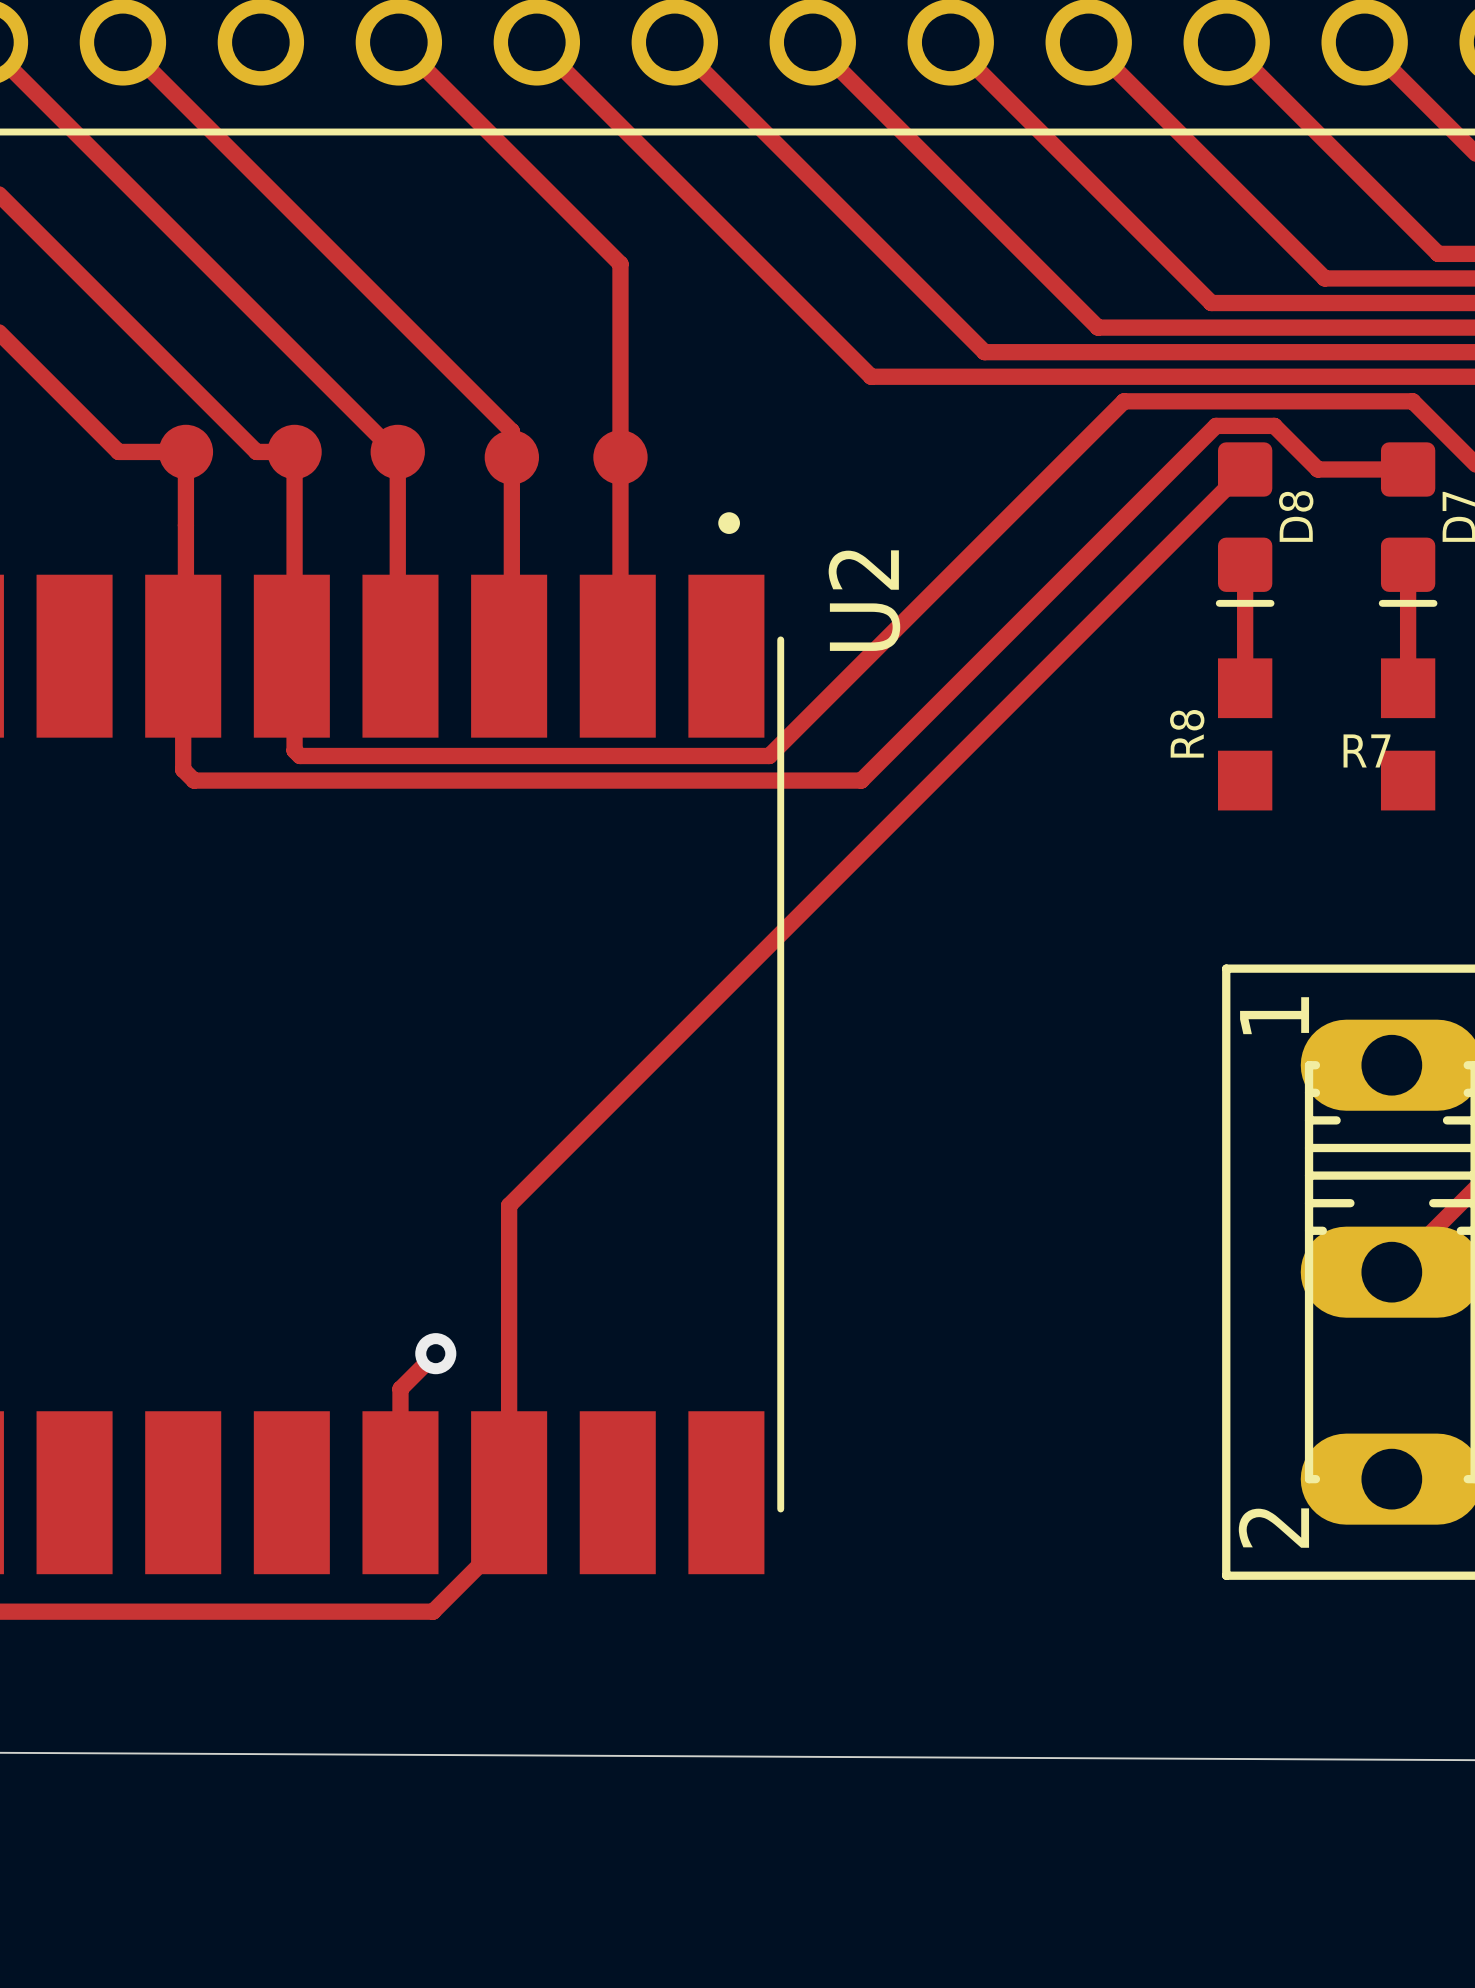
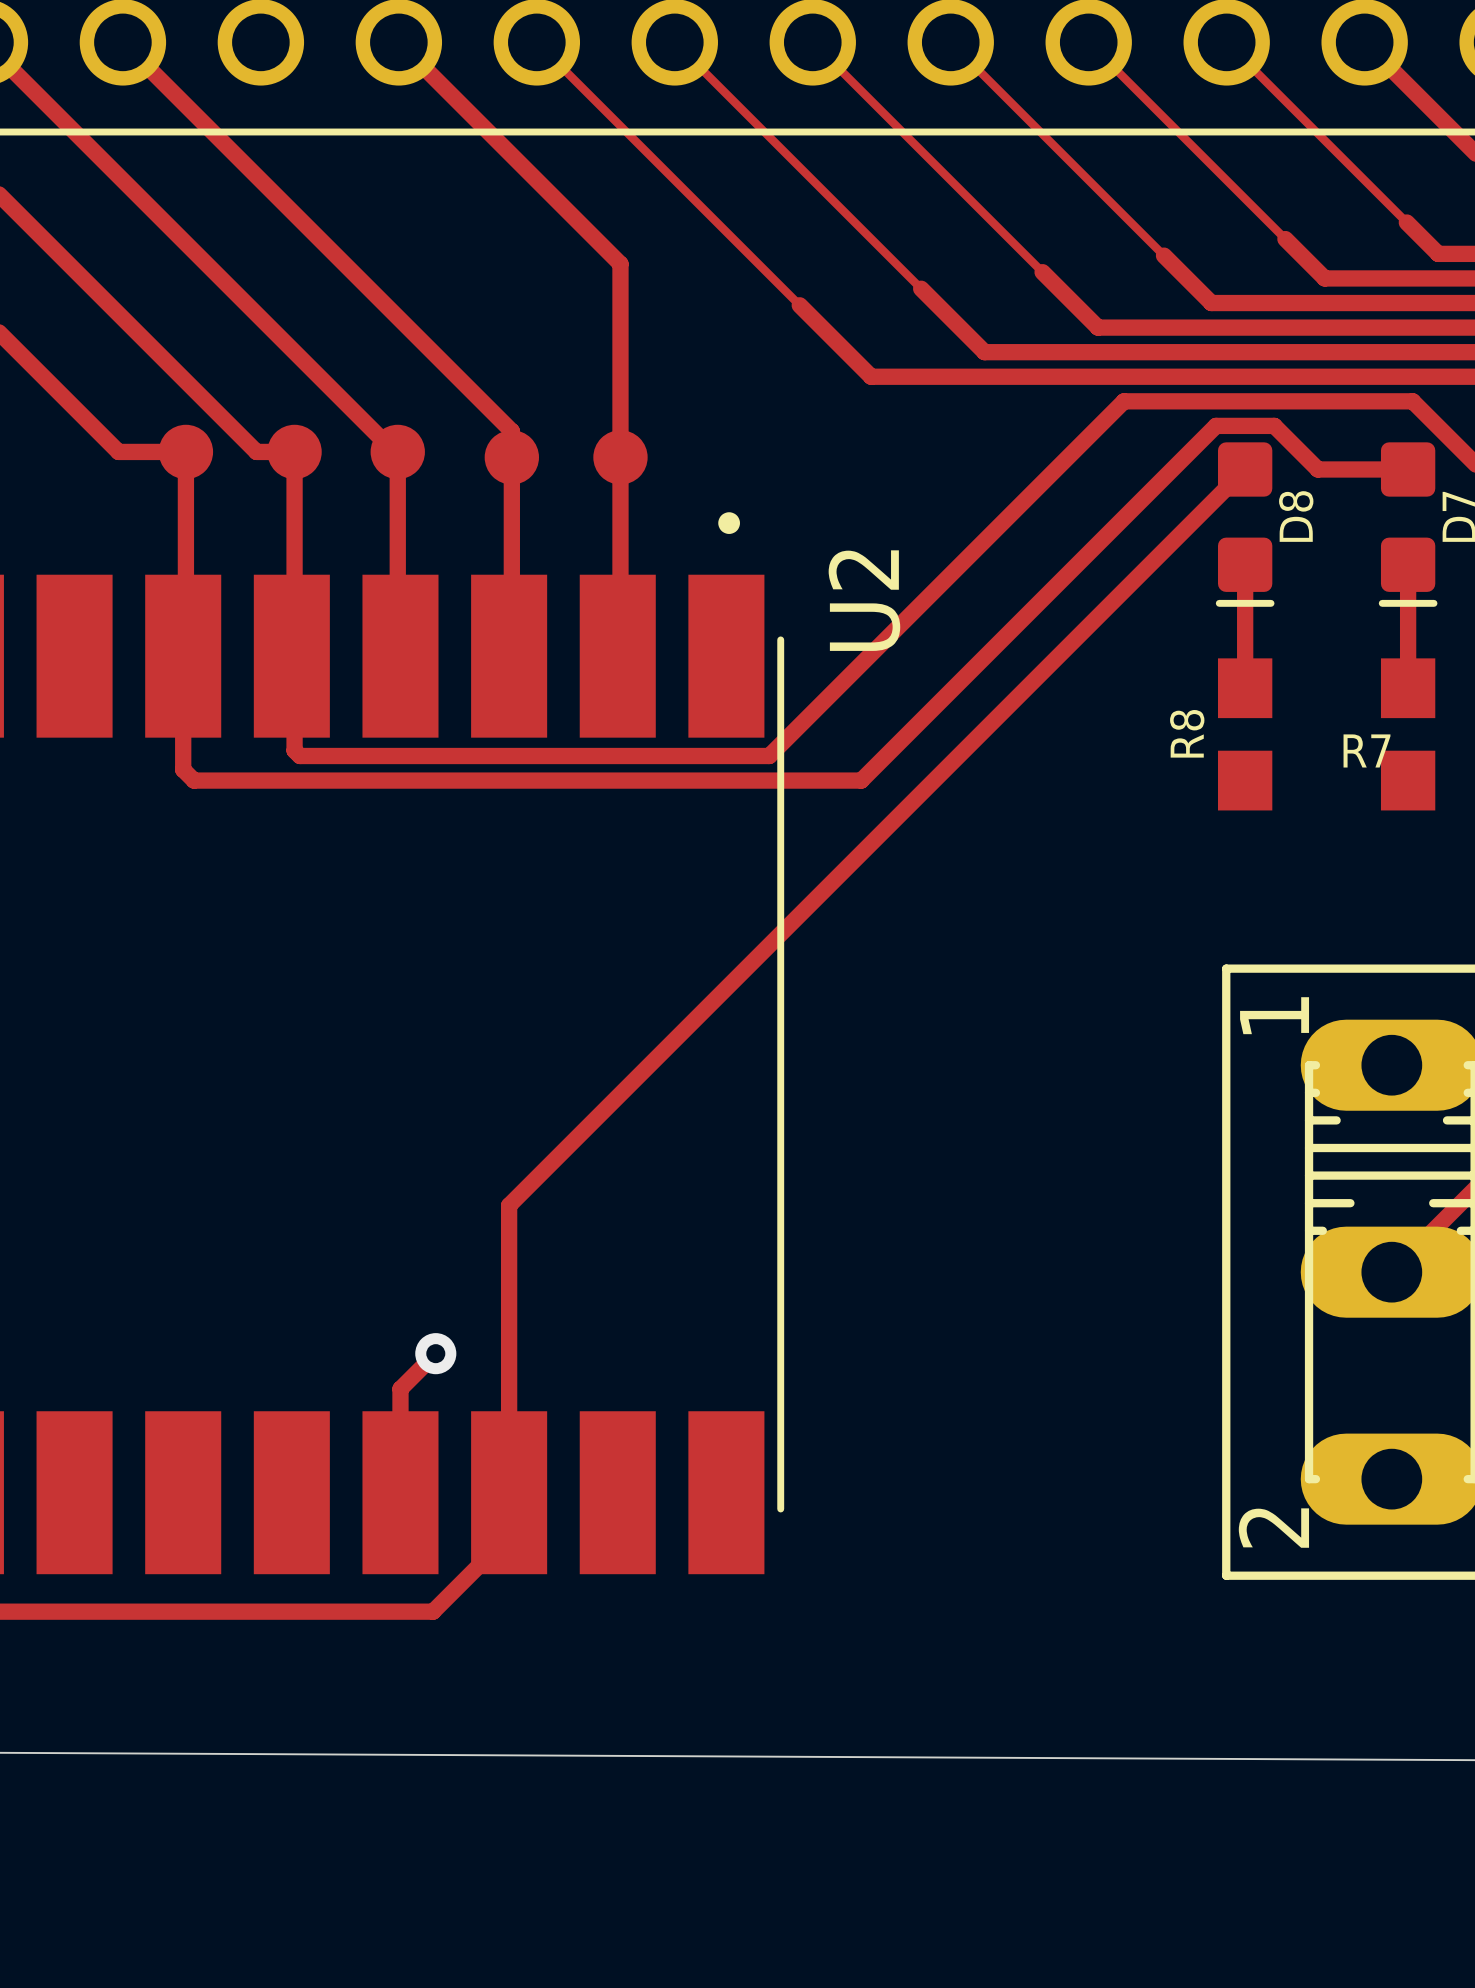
track width: thick (536, 42) (799, 305) -> thin (536, 42) (799, 305)
track width: thick (674, 42) (921, 288) -> thin (674, 42) (921, 288)
track width: thick (812, 42) (1042, 272) -> thin (812, 42) (1042, 272)
track width: thick (950, 42) (1163, 255) -> thin (950, 42) (1163, 255)
track width: thick (1088, 42) (1285, 239) -> thin (1088, 42) (1285, 239)
track width: thick (1226, 42) (1406, 222) -> thin (1226, 42) (1406, 222)

